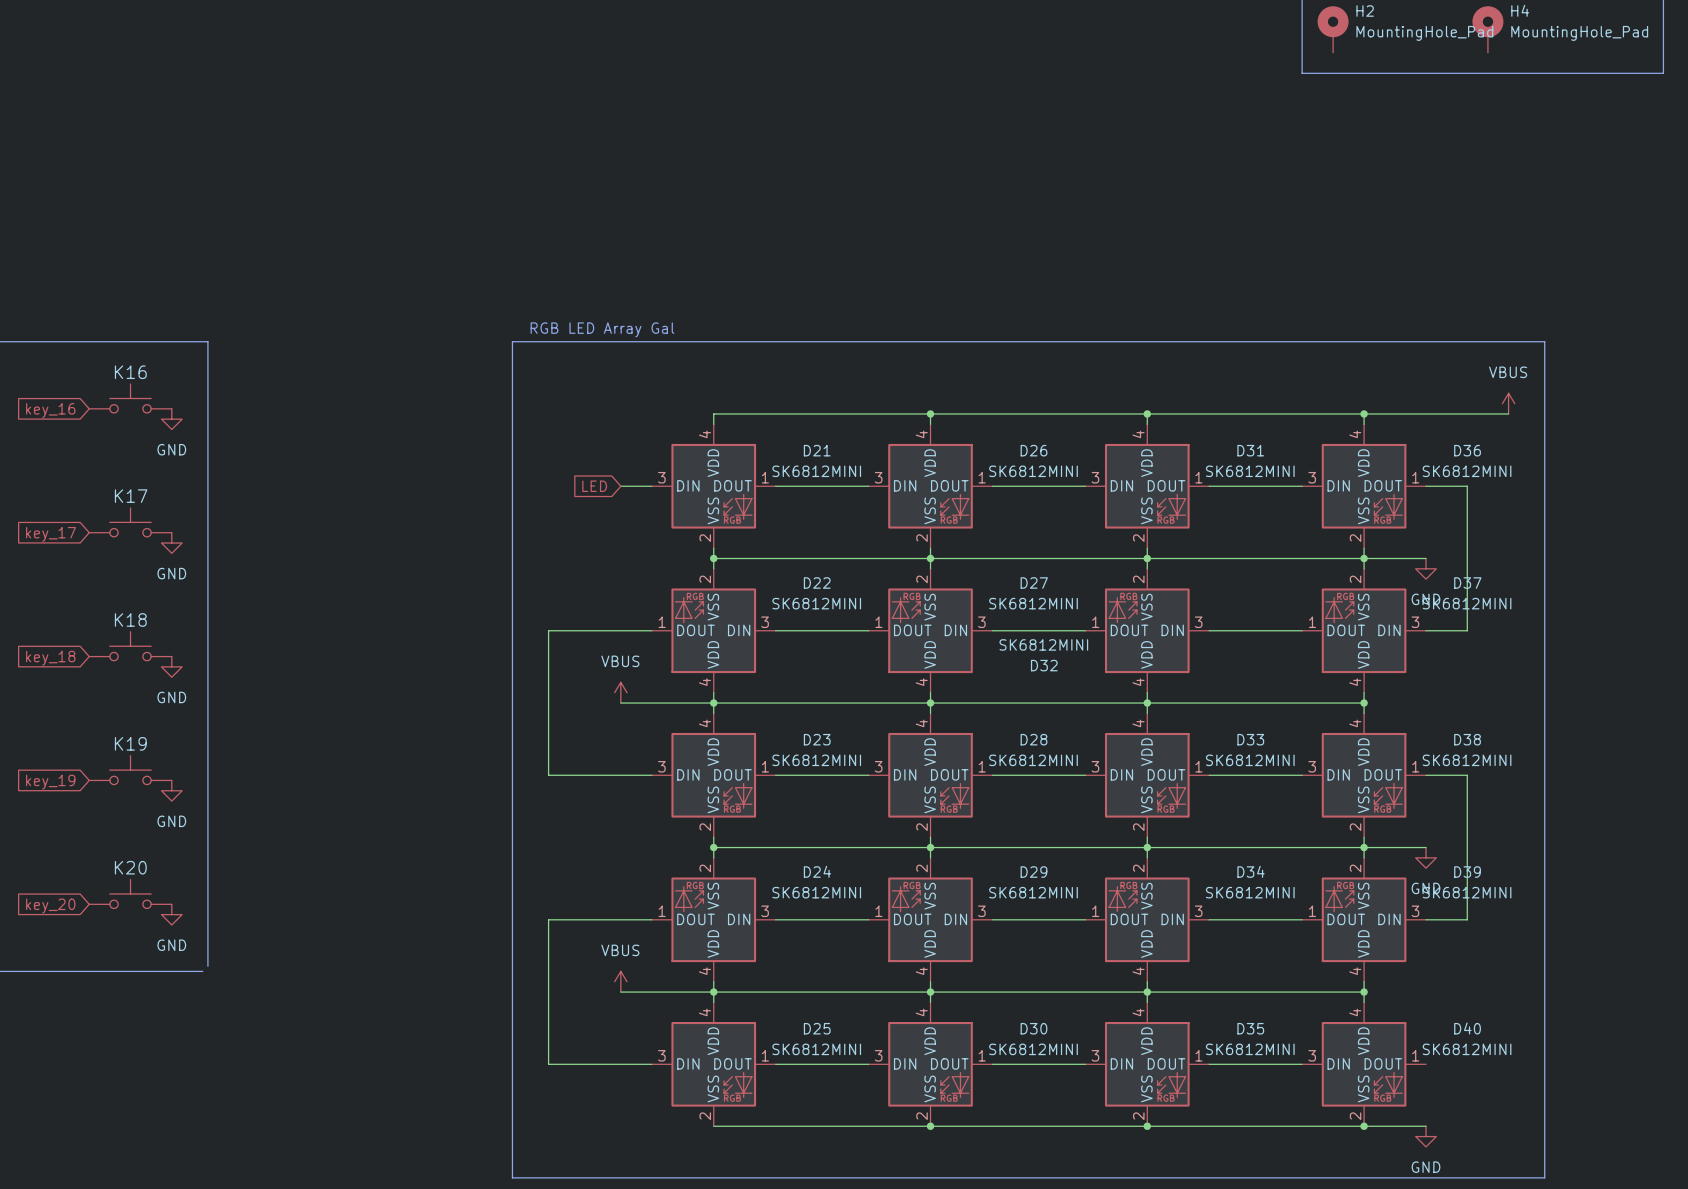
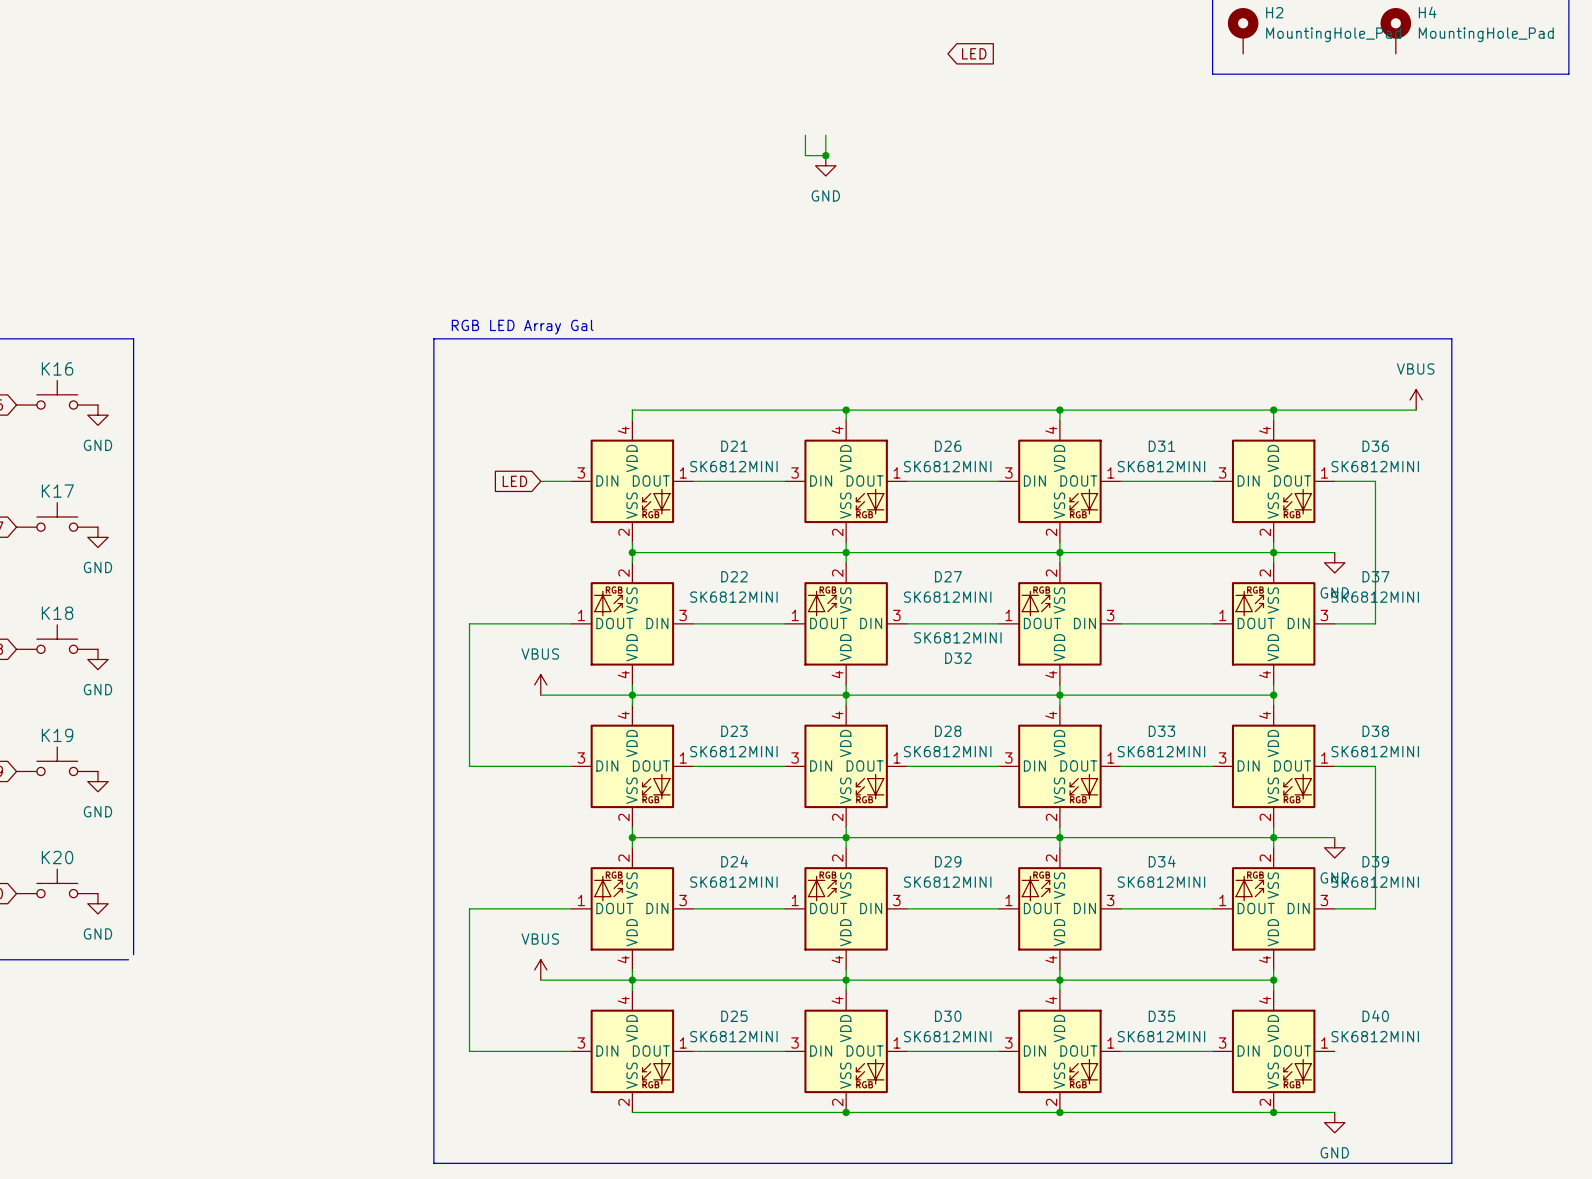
global label: none -> LED (974, 53)
wire: none -> (805, 135) (805, 155) (825, 155) (825, 135)
junction: none -> (825, 155)
power symbol: none -> GND (825, 165)

